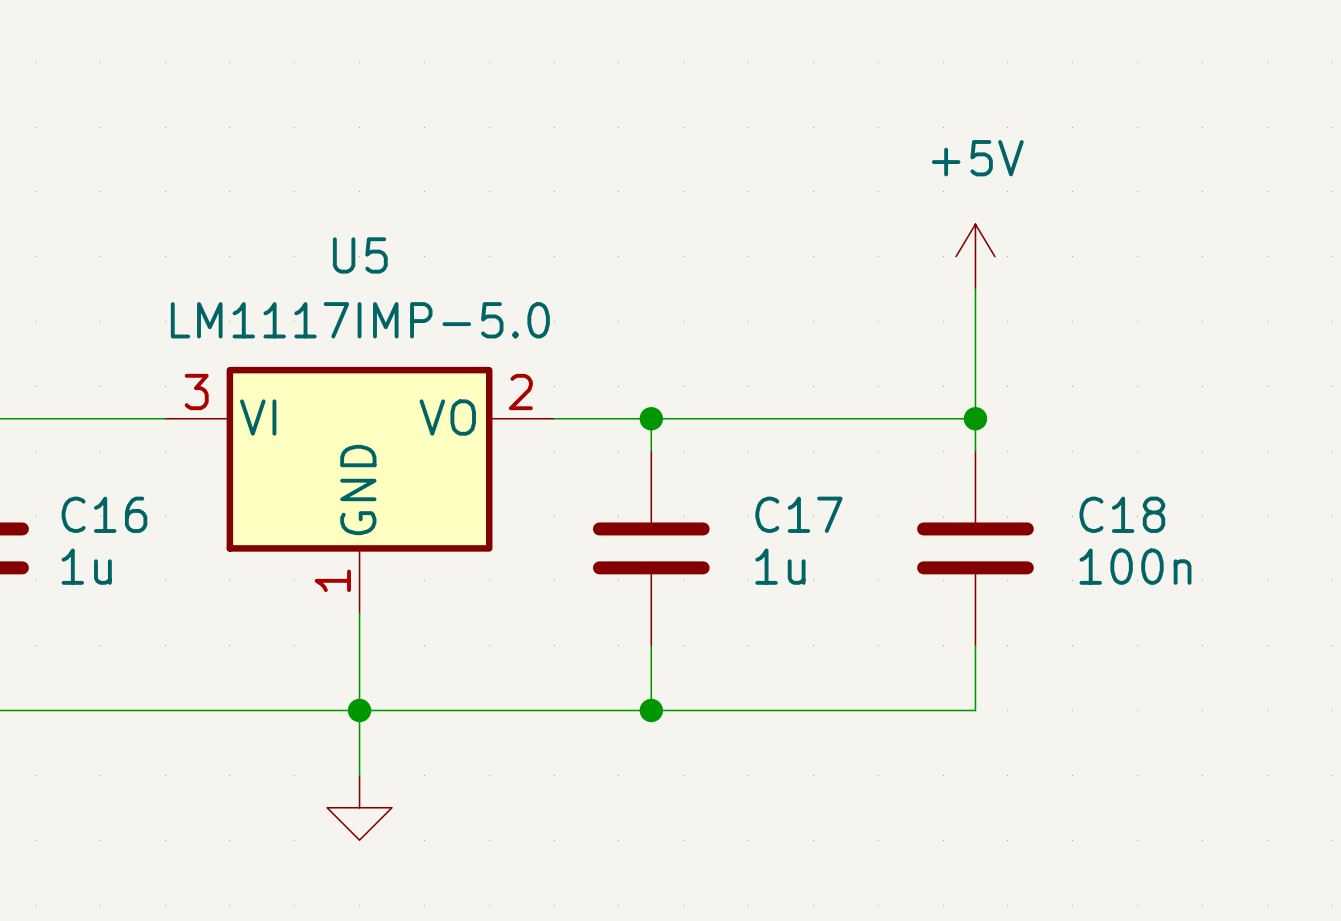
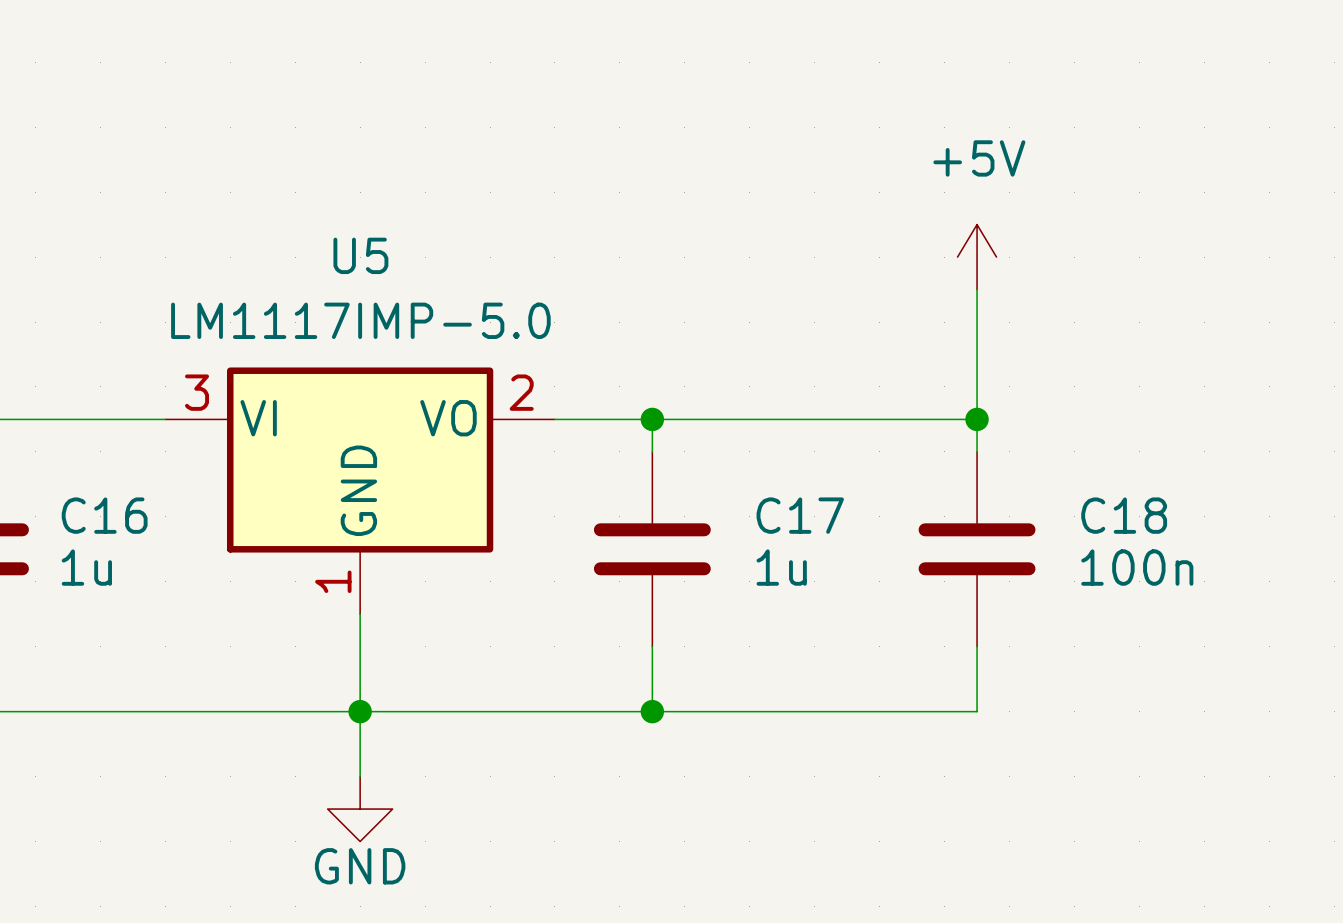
power symbol text: none -> GND (360, 866)

